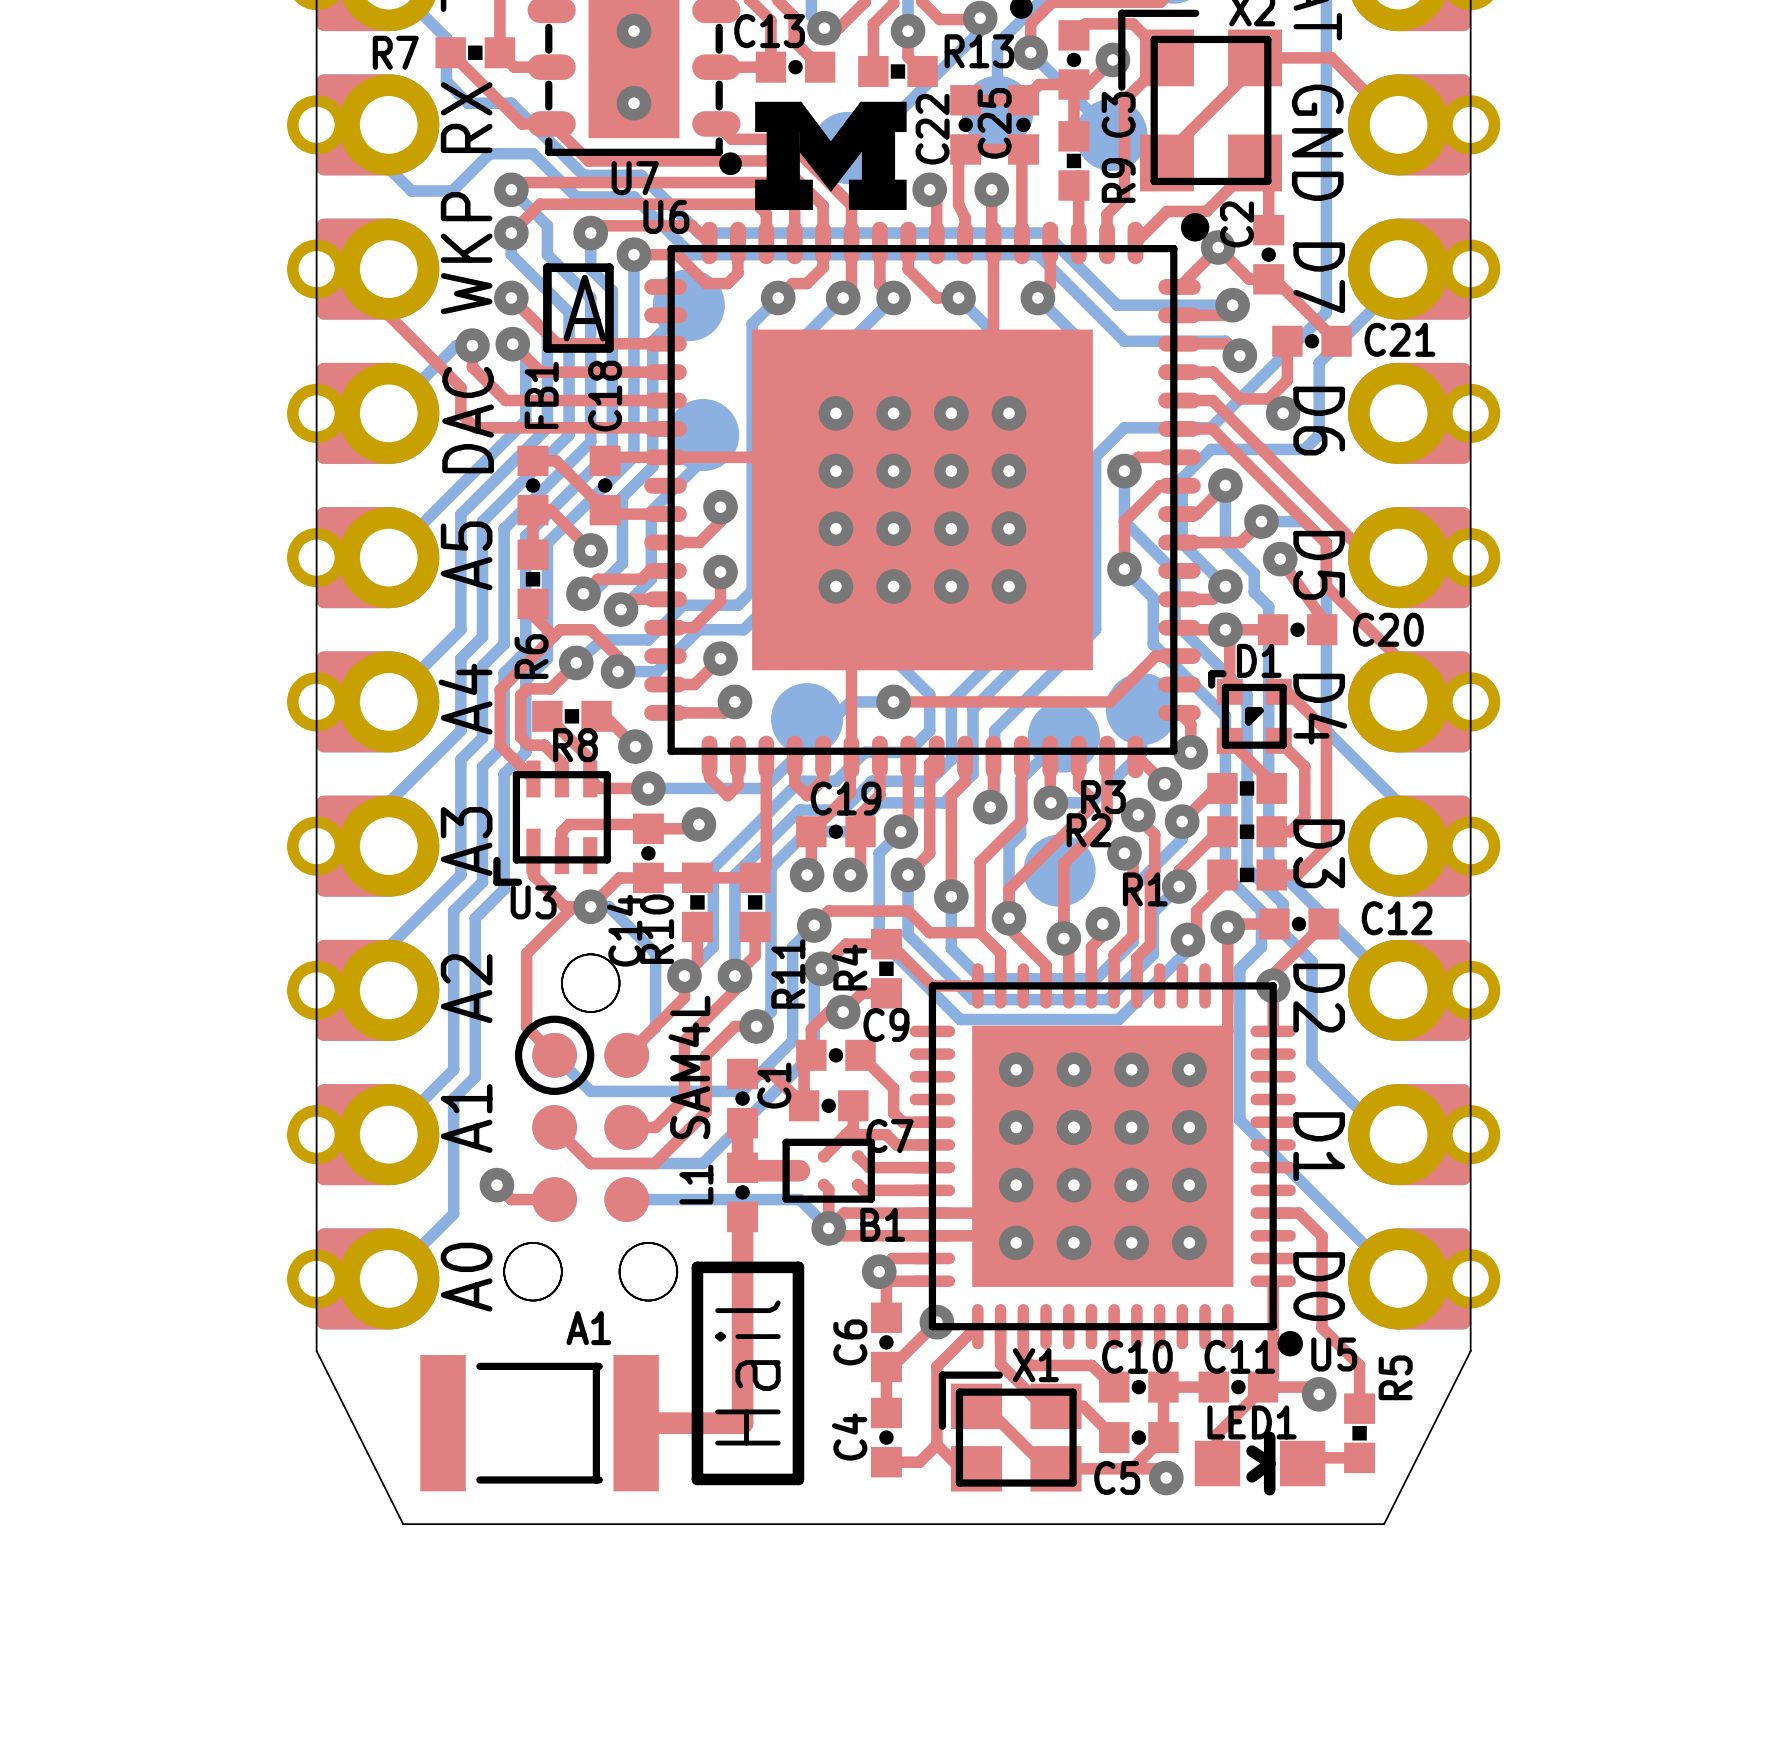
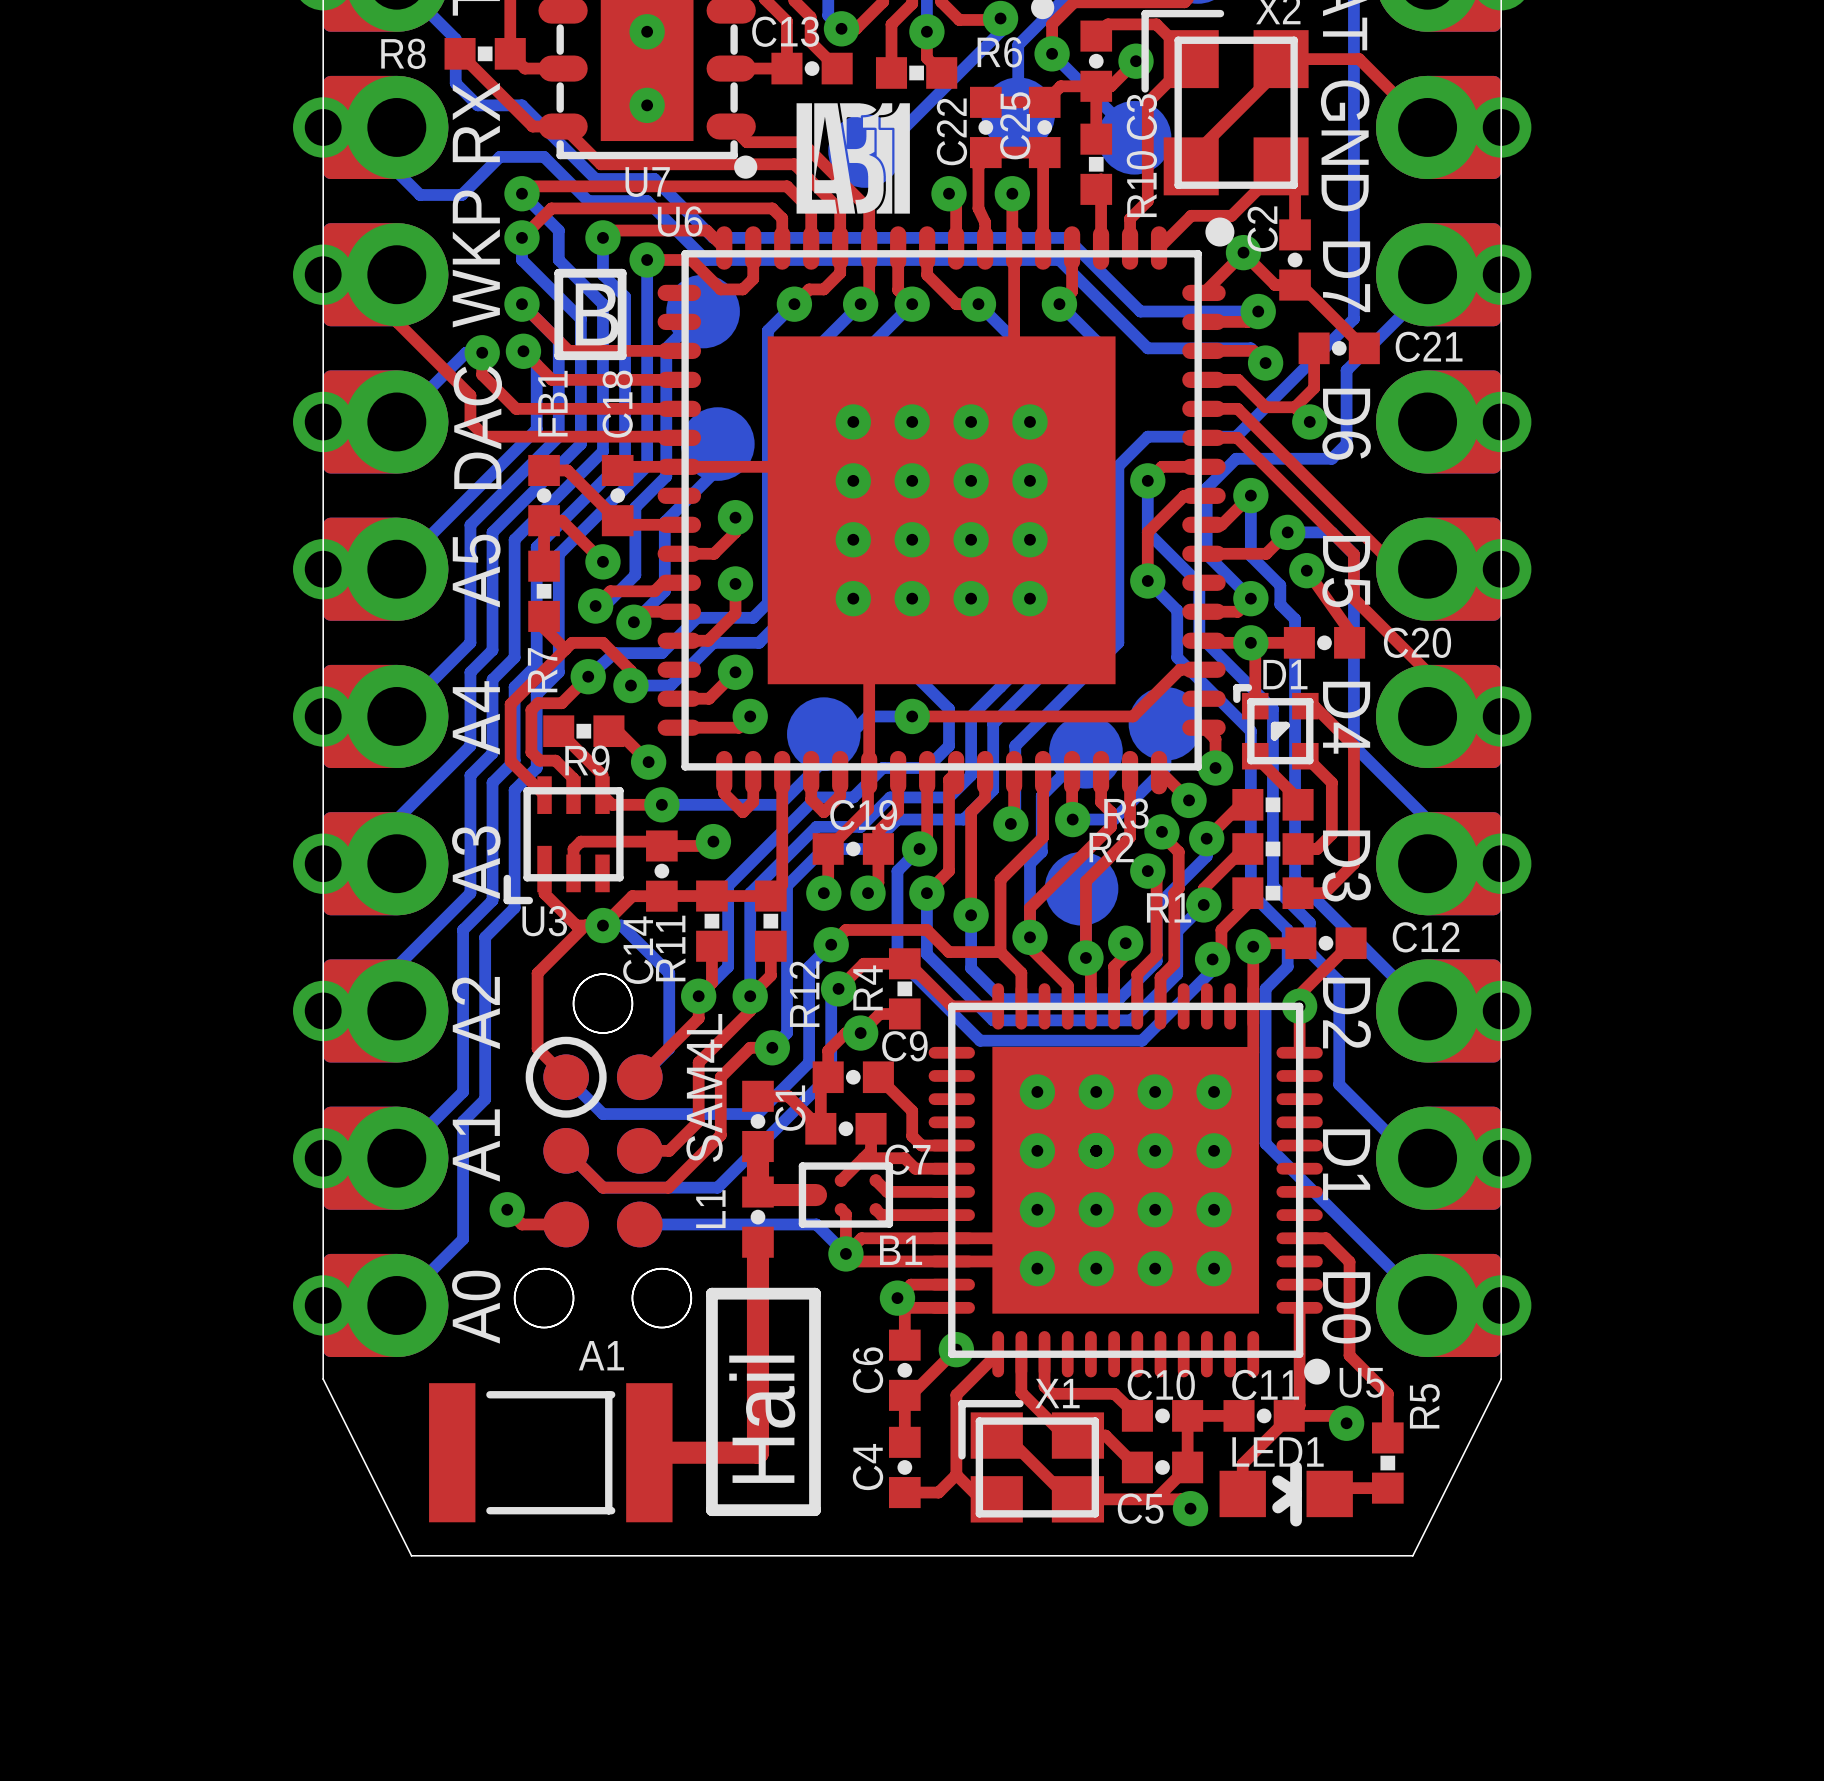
R13 name: R13 (979, 51) -> R6 (999, 52)
R7 name: R7 (395, 52) -> R8 (403, 53)
drawing shape: [755, 101, 907, 210] -> [796, 103, 910, 214]
R9 name: R9 (1118, 180) -> R10 (1141, 184)
text: A (584, 308) -> B (597, 314)
R6 name: R6 (531, 656) -> R7 (542, 670)
R8 name: R8 (575, 745) -> R9 (587, 760)
R10 name: R10 (657, 929) -> R11 (670, 948)
R11 name: R11 (788, 973) -> R12 (804, 994)

